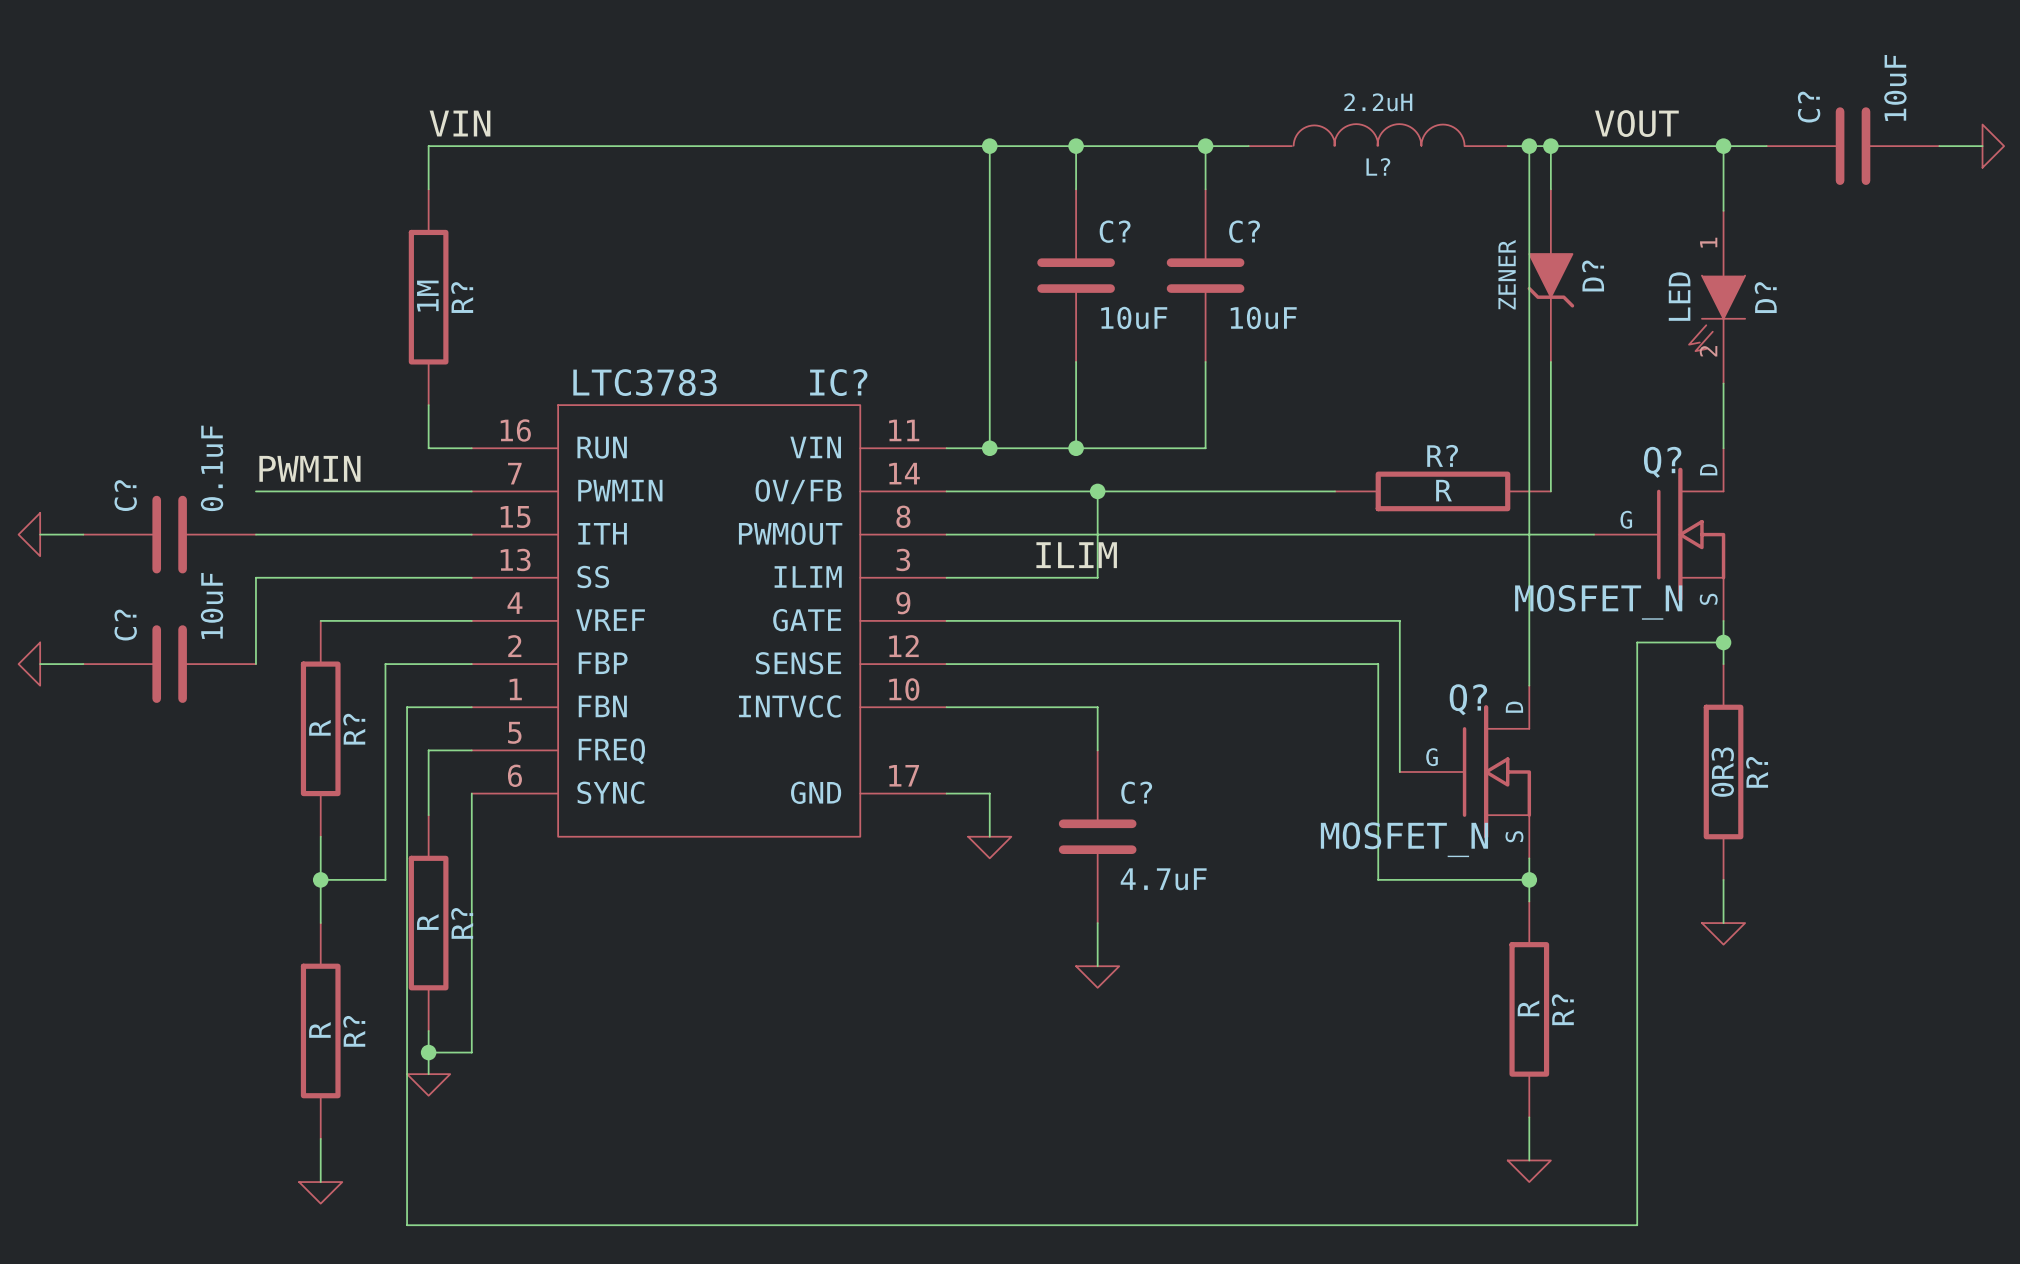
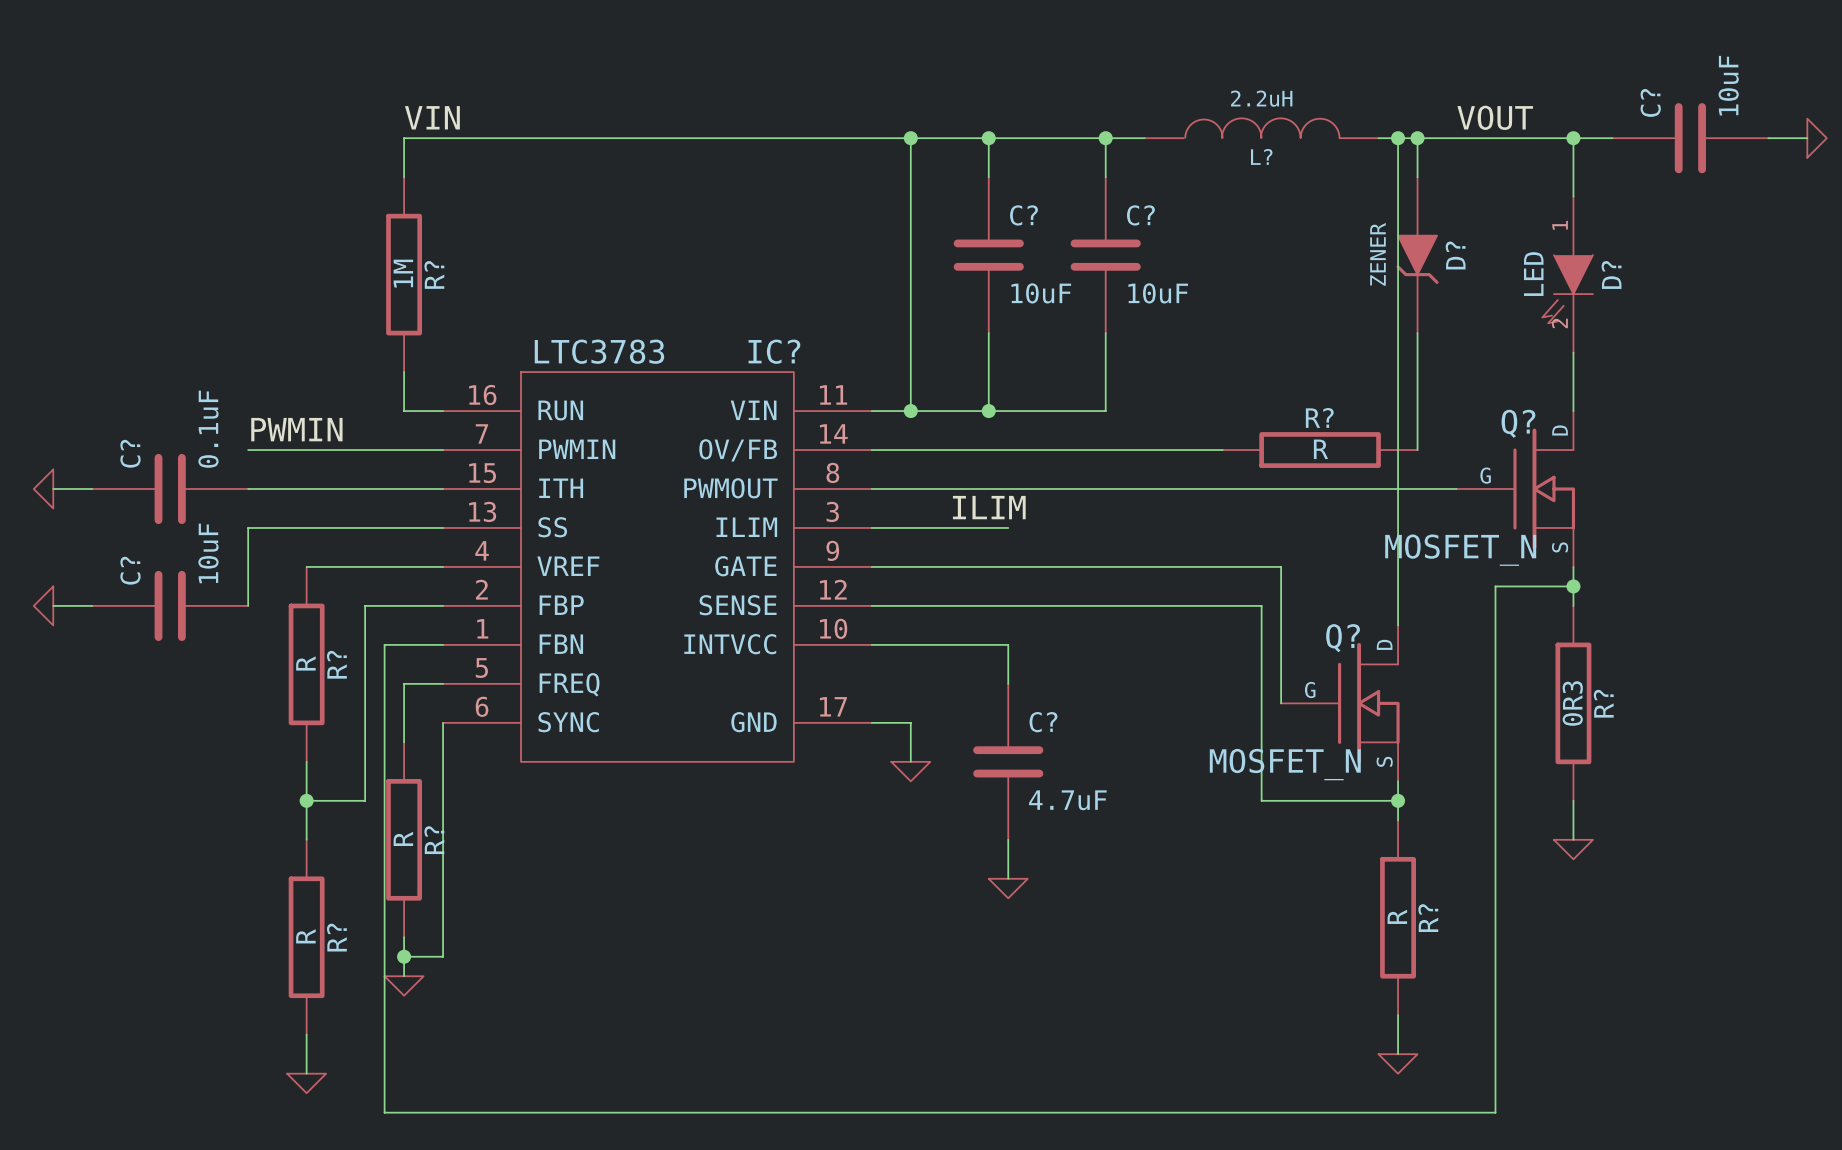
wire: (1097, 491) (1097, 577) -> none
junction: (1097, 491) -> none

